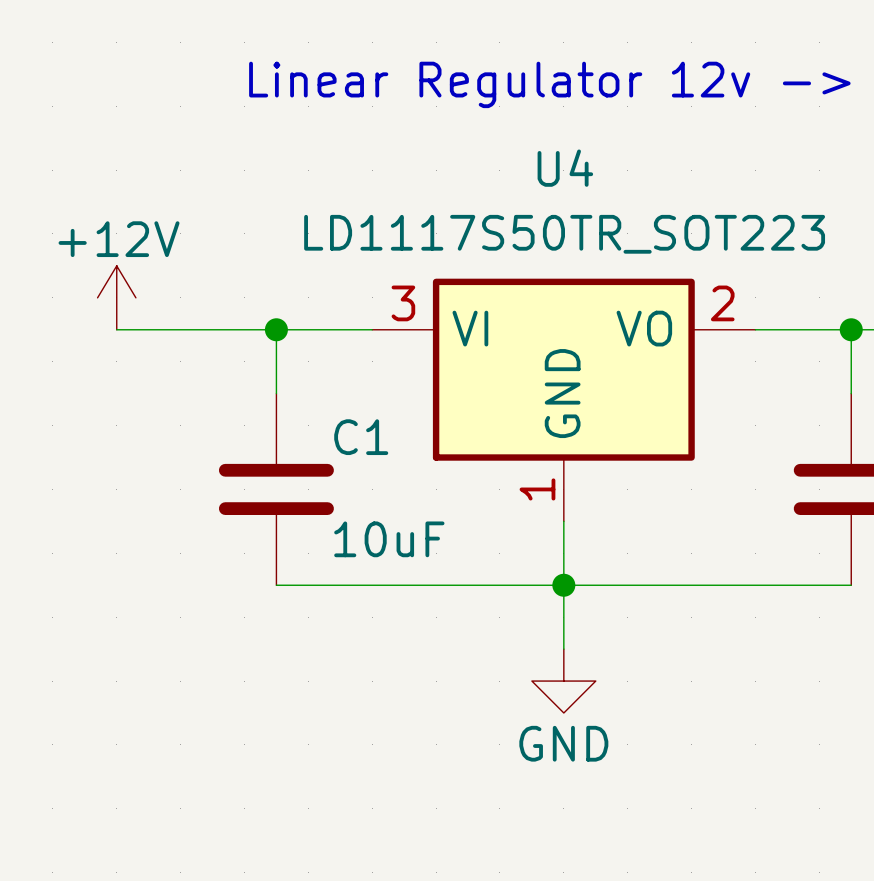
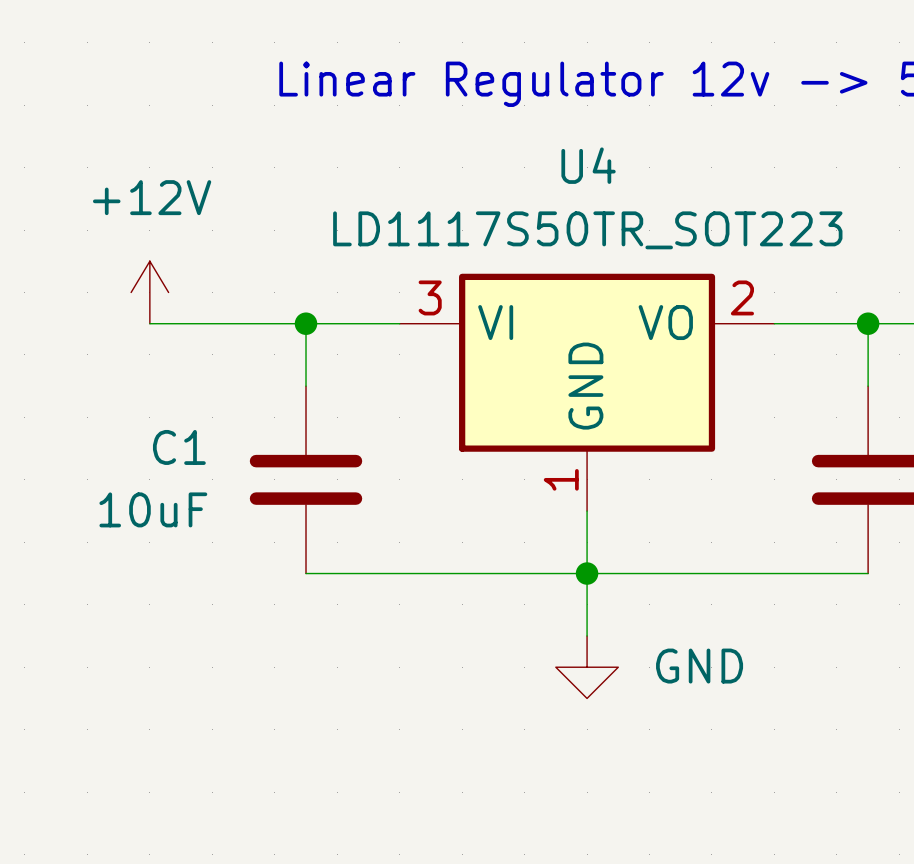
power symbol text position: +12V (119, 239) -> +12V (152, 197)
C1 name position: C1 (361, 437) -> C1 (179, 447)
C1 value position: 10uF (389, 539) -> 10uF (153, 509)
power symbol text position: GND (563, 743) -> GND (699, 666)

